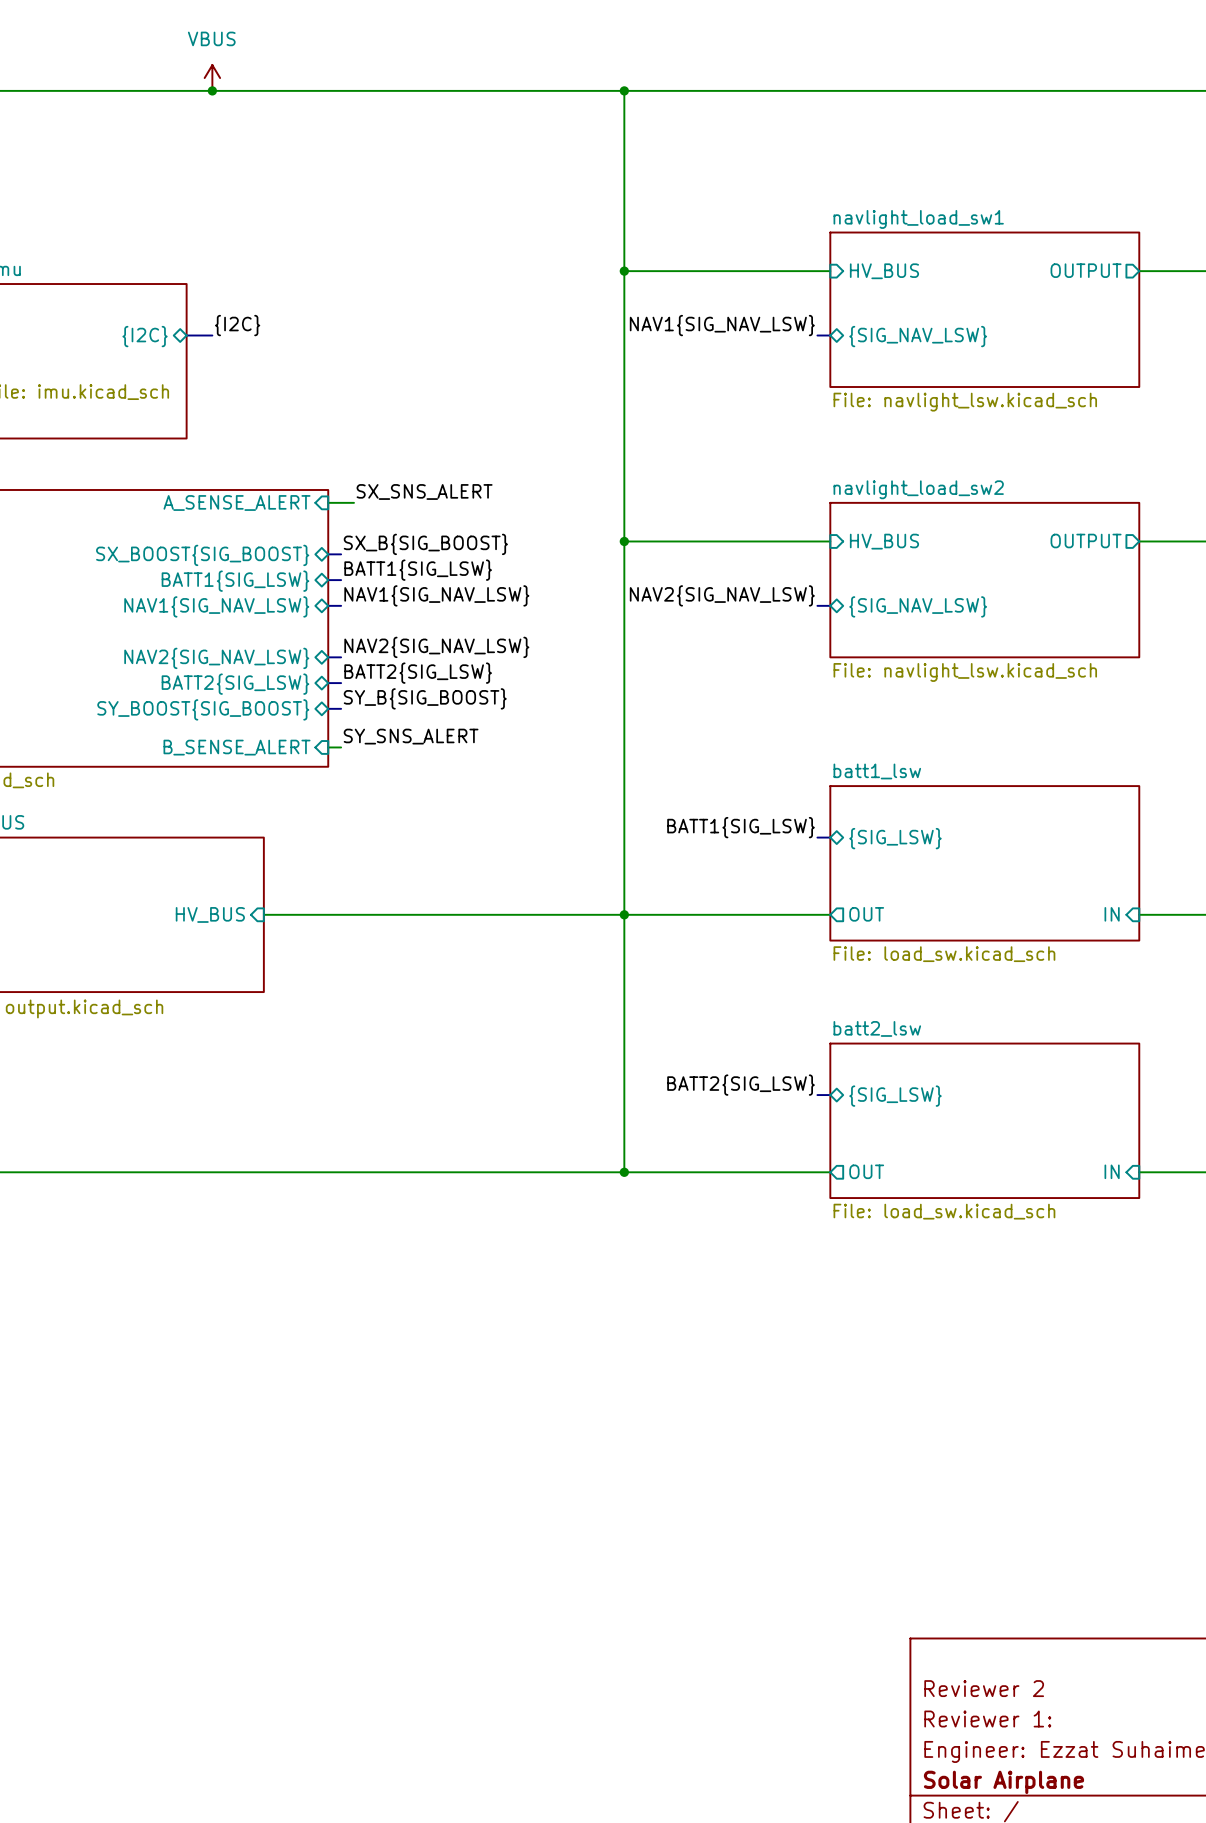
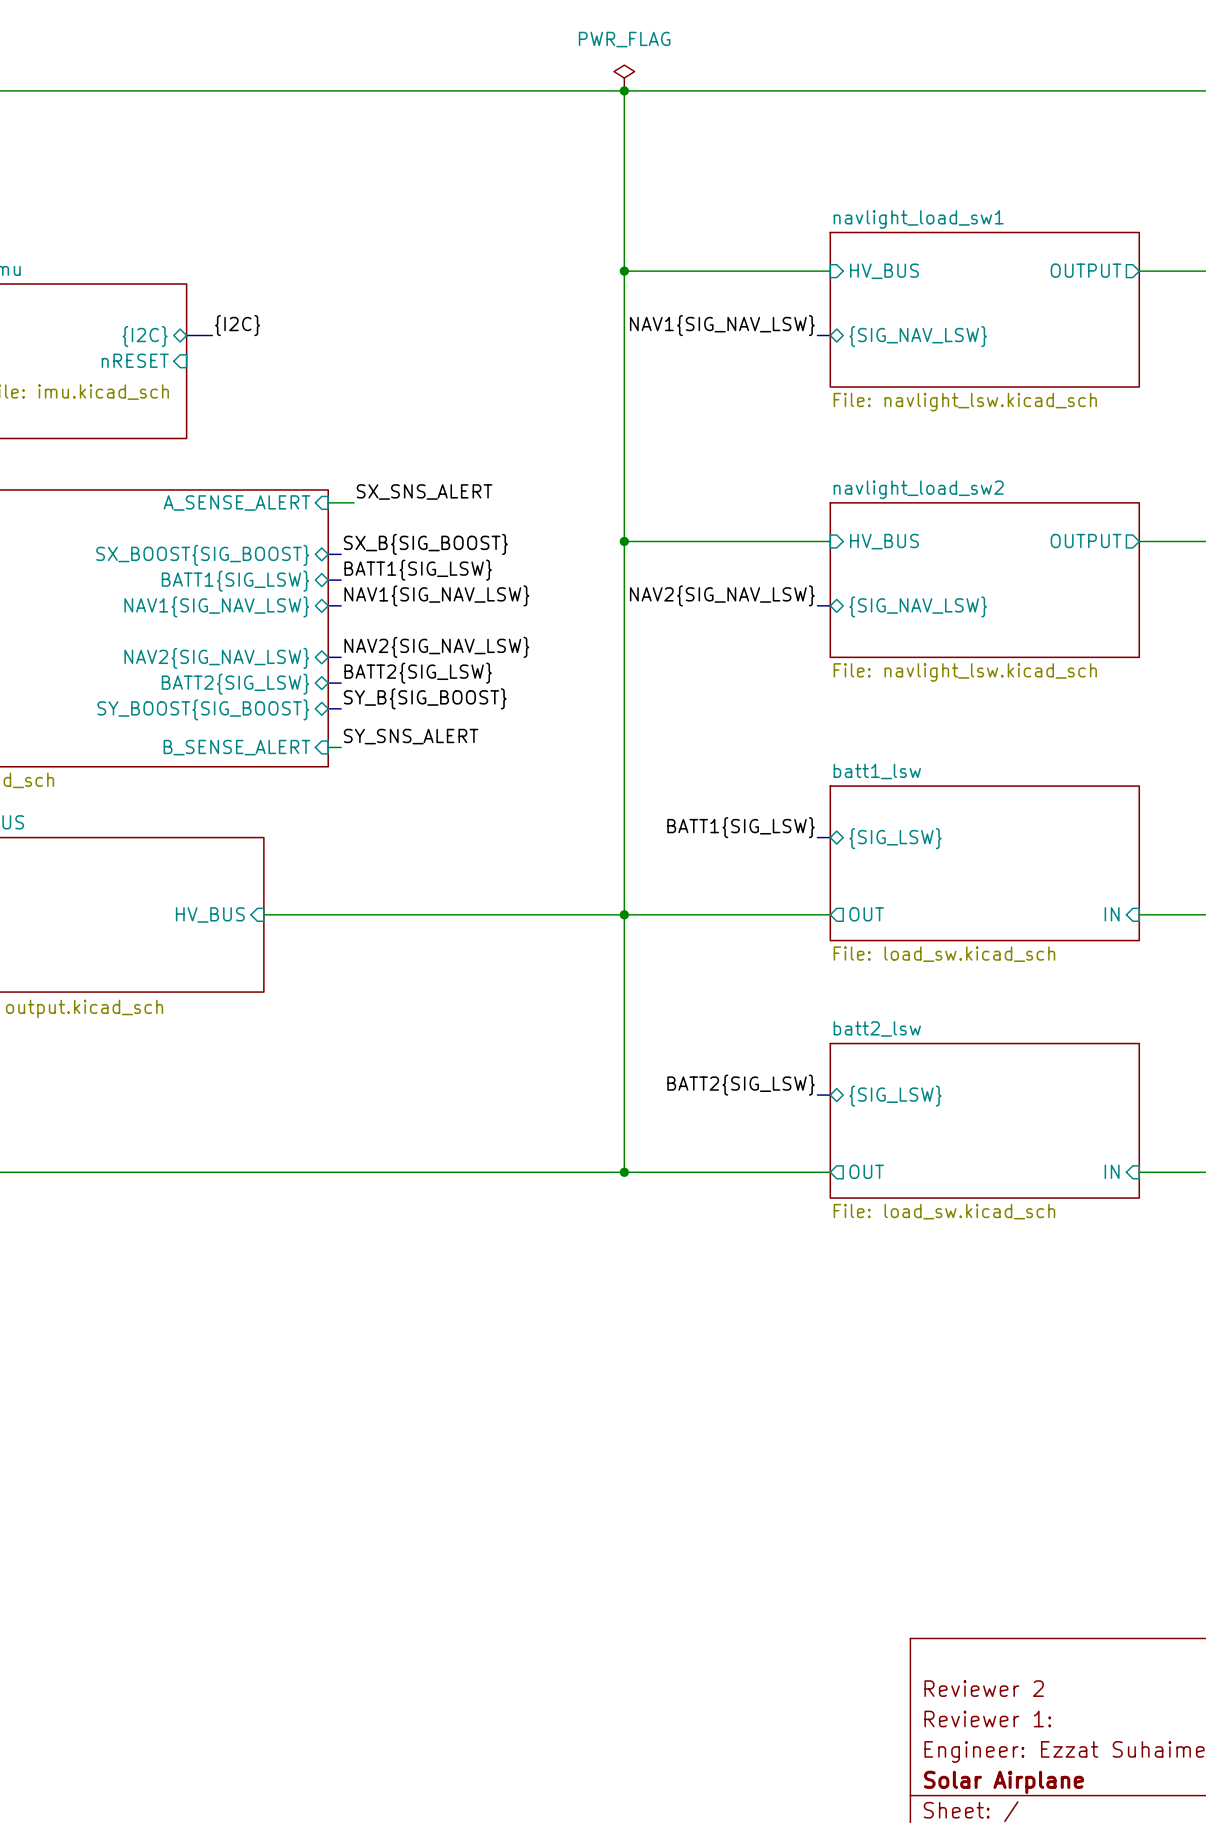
power symbol: VBUS (212, 78) -> none
power symbol: none -> PWR_FLAG (624, 78)
junction: (212, 90) -> none
sheet pin: none -> nRESET (135, 360)

